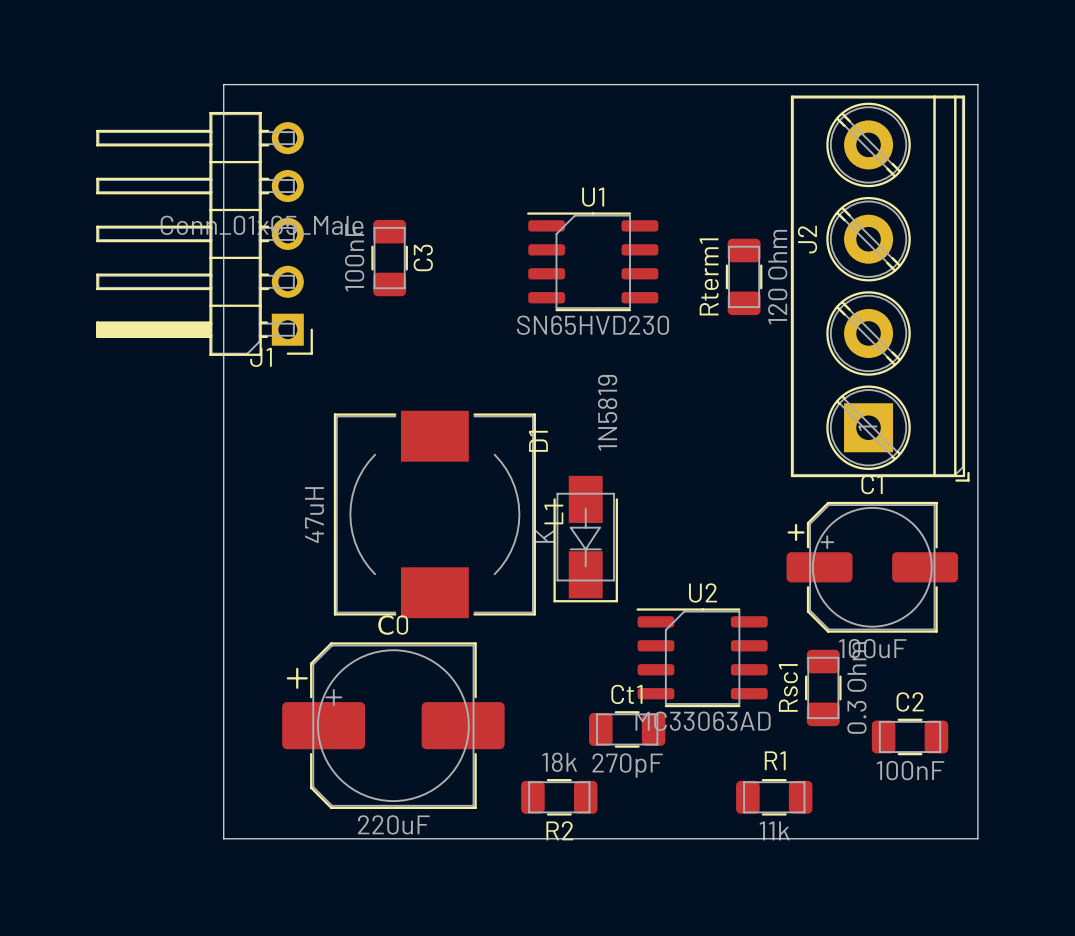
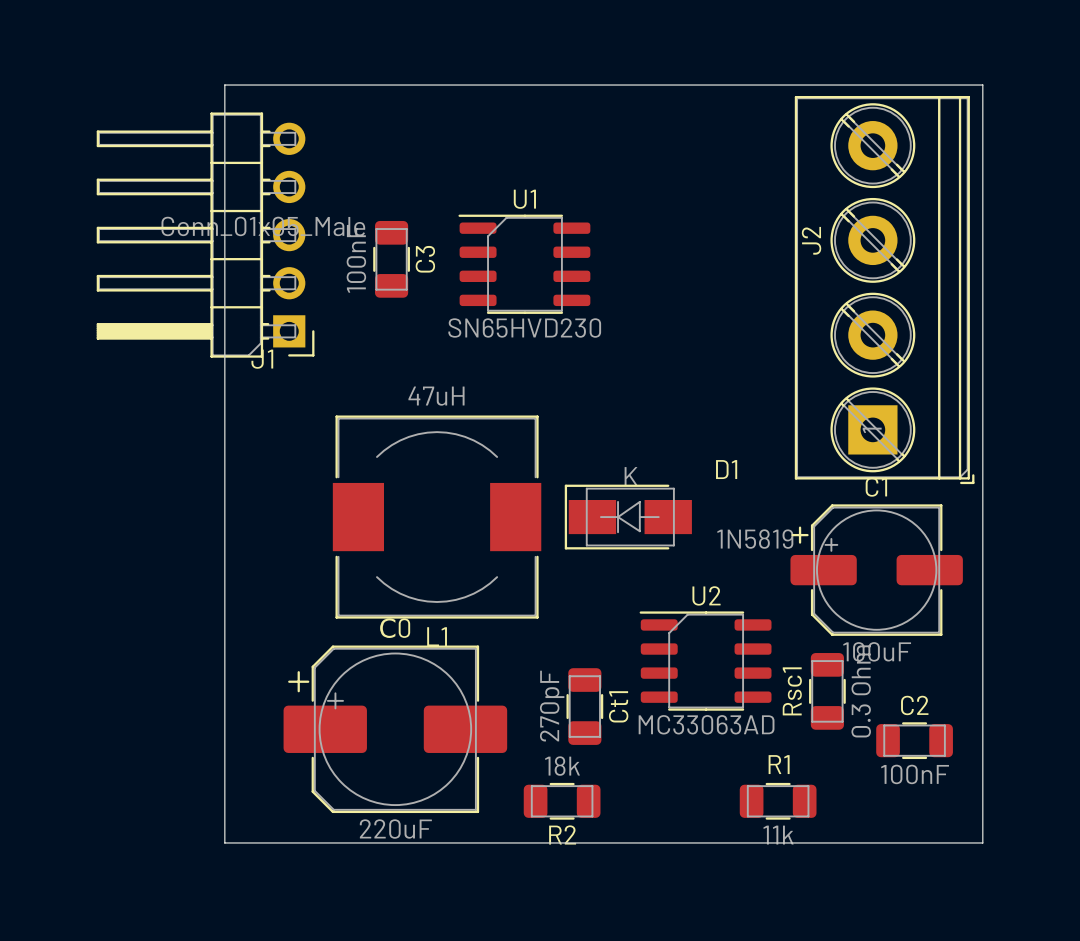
U1 position: (592, 261) -> (524, 264)
Rterm1: 120 Ohm (744, 276) -> none
L1 rotation: 0° (434, 514) -> 90° clockwise (437, 517)
D1 rotation: 0° (585, 539) -> 90° clockwise (628, 517)
Ct1 rotation: 0° (627, 729) -> 90° clockwise (584, 706)
Ct1 position: (627, 729) -> (584, 706)

